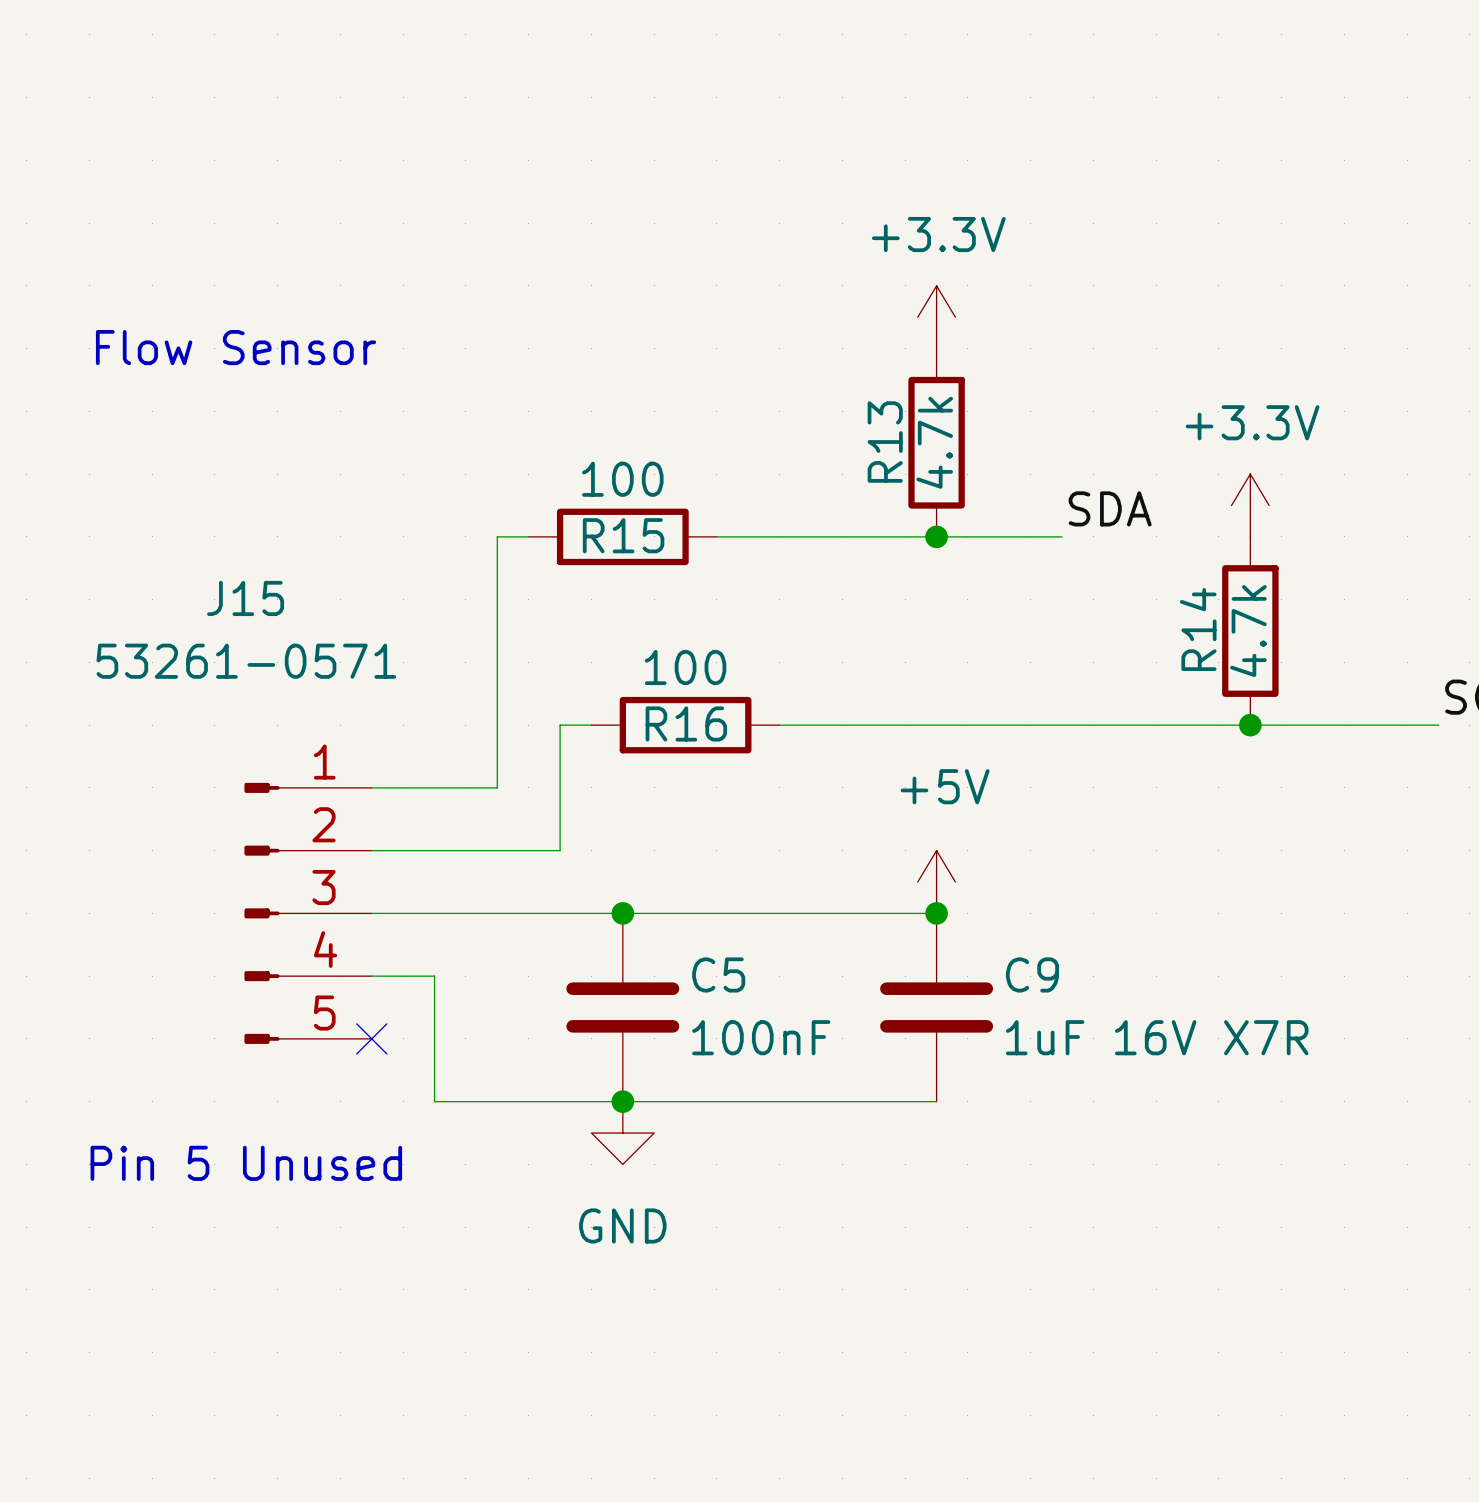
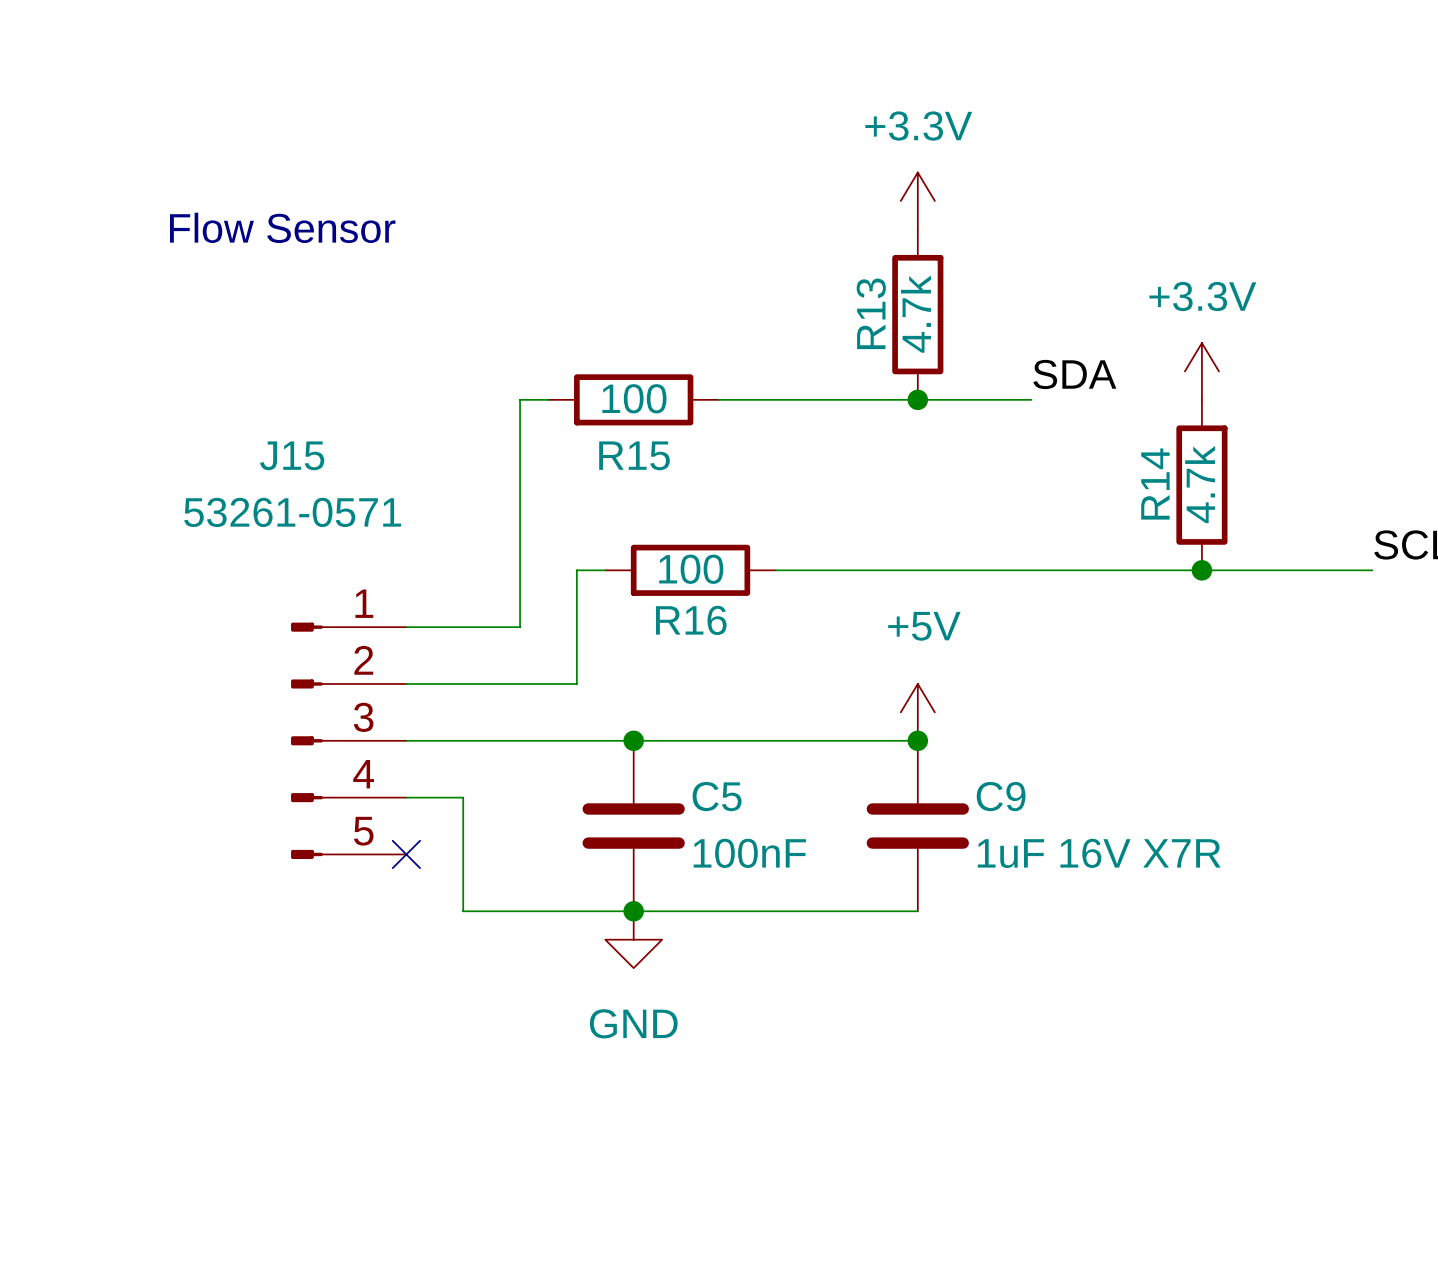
R15 value position: 100 (622, 479) -> 100 (634, 398)
R15 name position: R15 (623, 535) -> R15 (634, 455)
R16 value position: 100 (685, 667) -> 100 (691, 569)
R16 name position: R16 (686, 723) -> R16 (691, 620)
text: Pin 5 Unused (246, 1163) -> none

